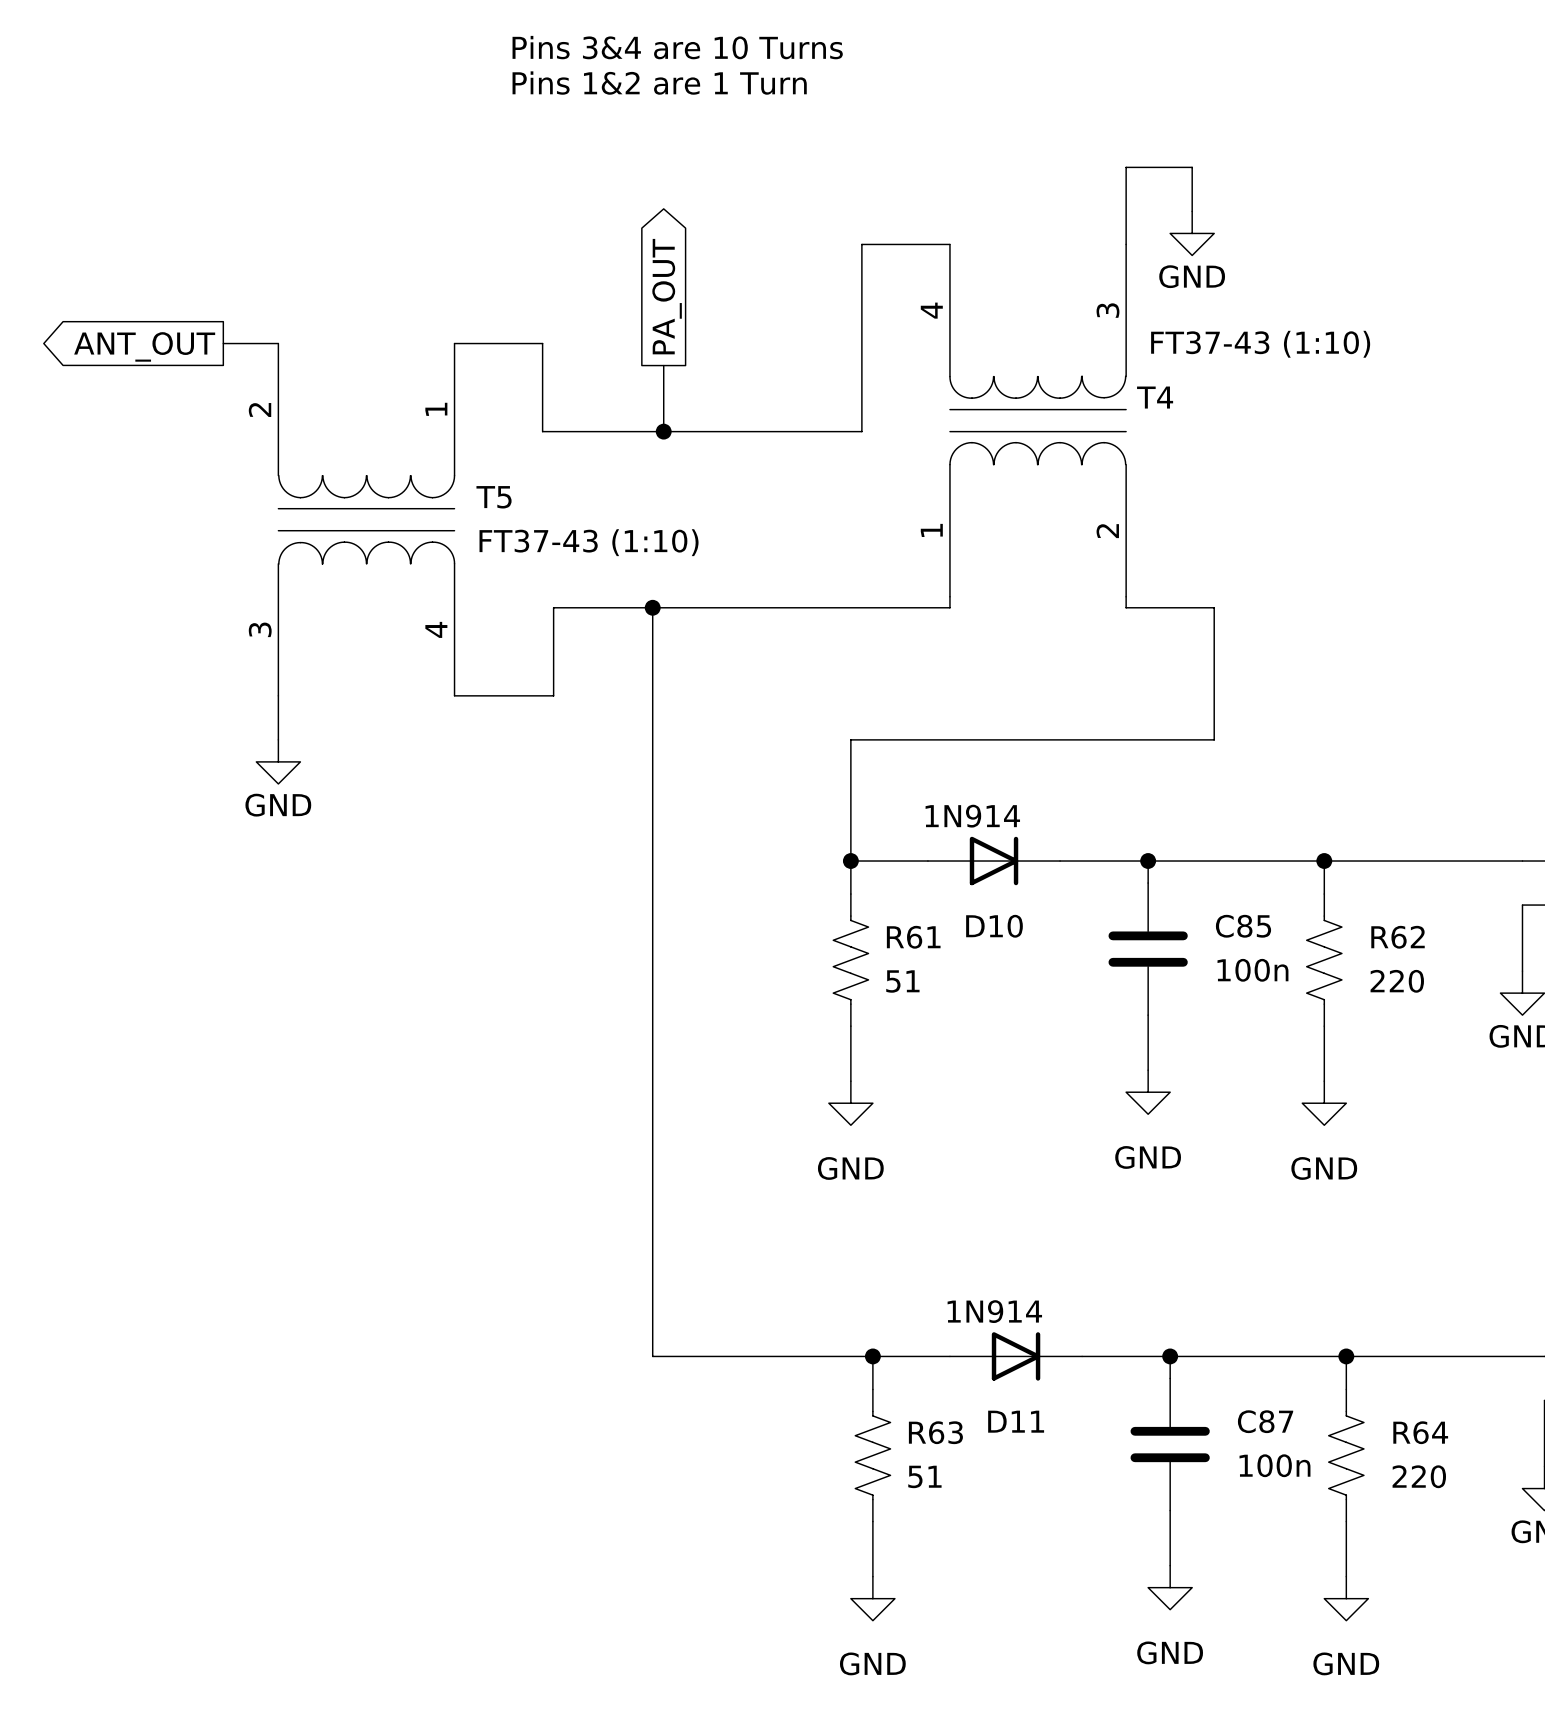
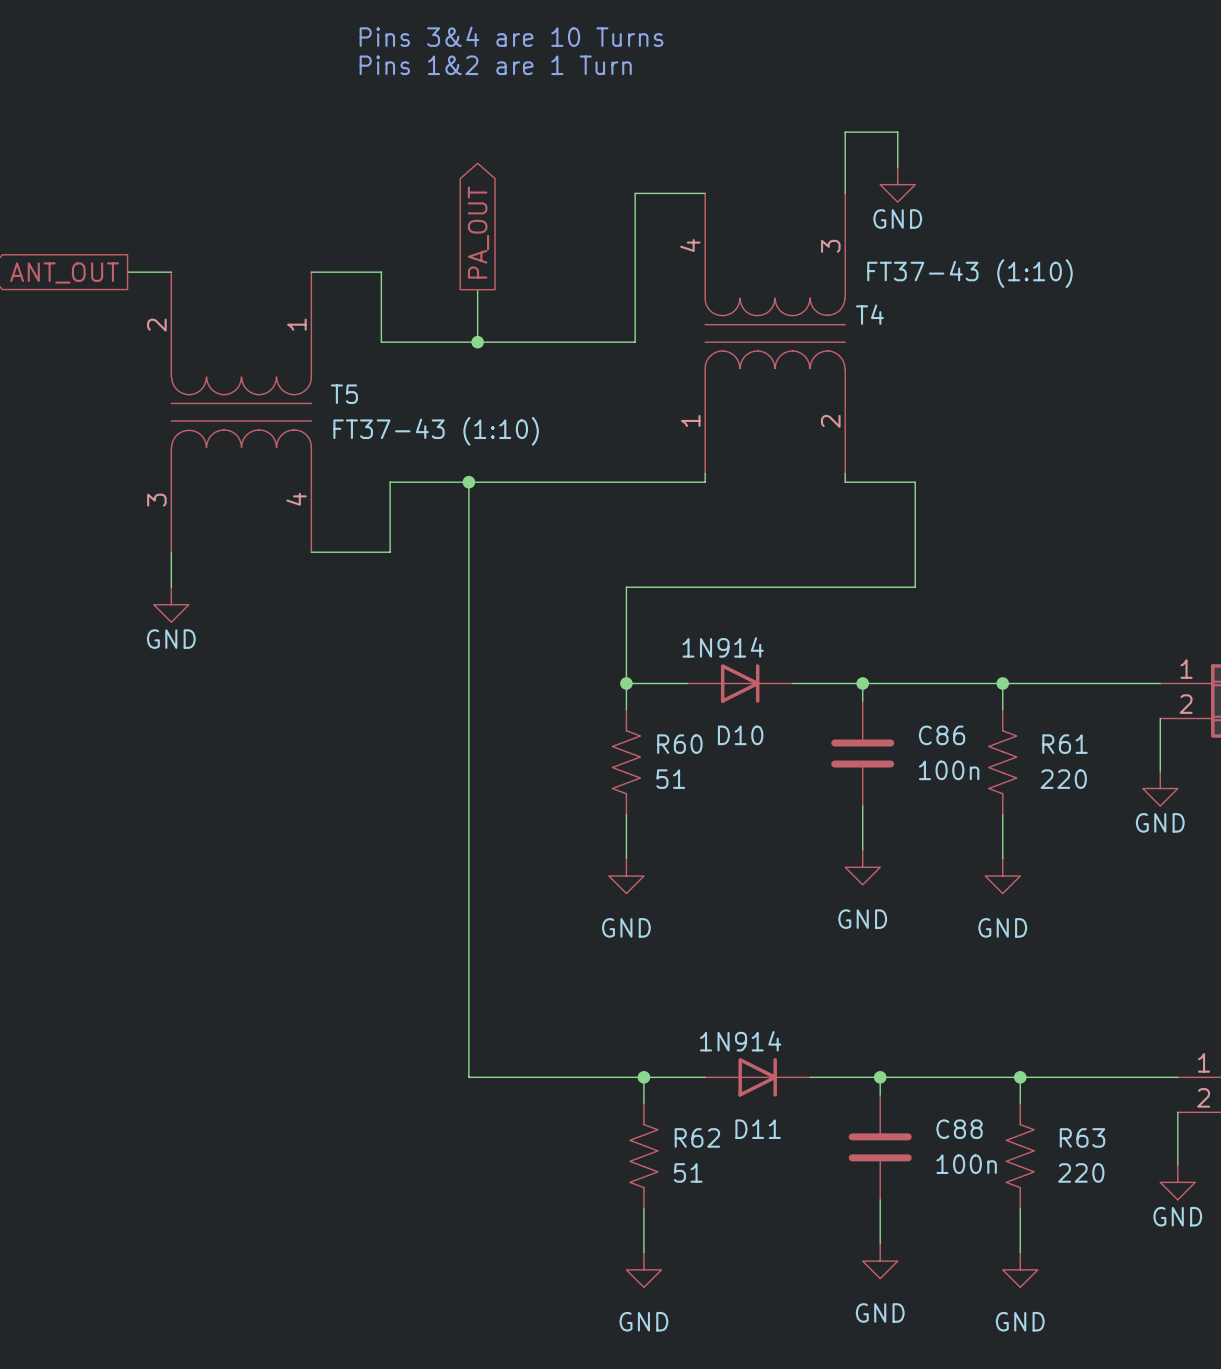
C85 name: C85 (1243, 926) -> C86 (942, 735)
R61 name: R61 (913, 937) -> R60 (679, 744)
R62 name: R62 (1398, 937) -> R61 (1064, 744)
C87 name: C87 (1265, 1421) -> C88 (959, 1129)
R63 name: R63 (935, 1432) -> R62 (697, 1137)
R64 name: R64 (1420, 1432) -> R63 (1082, 1137)

